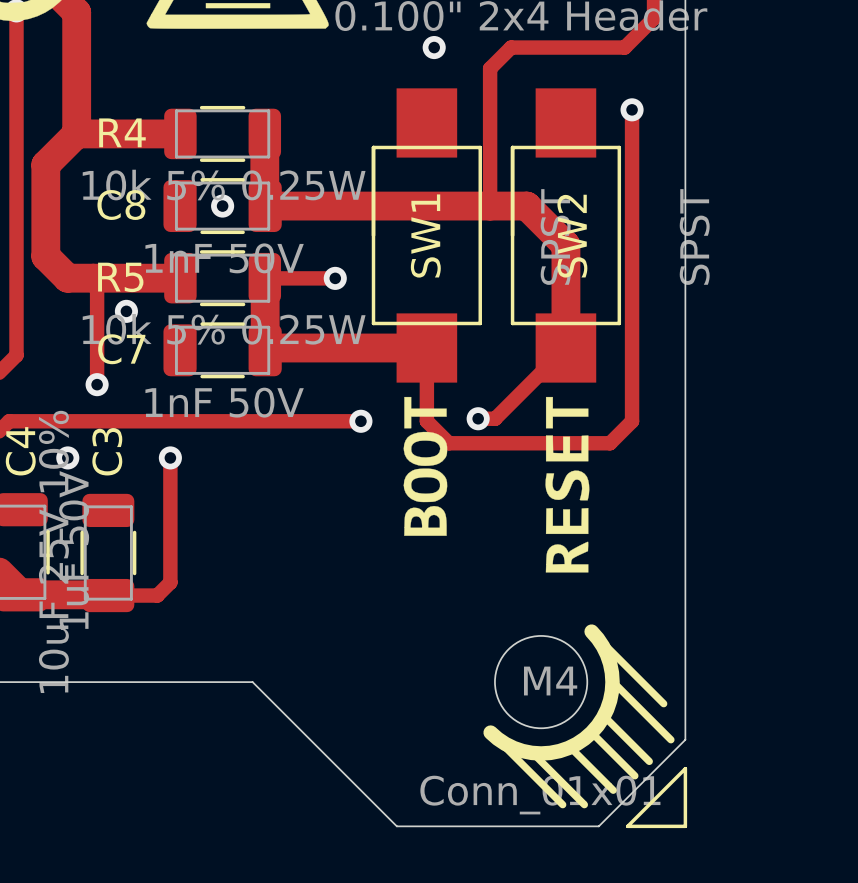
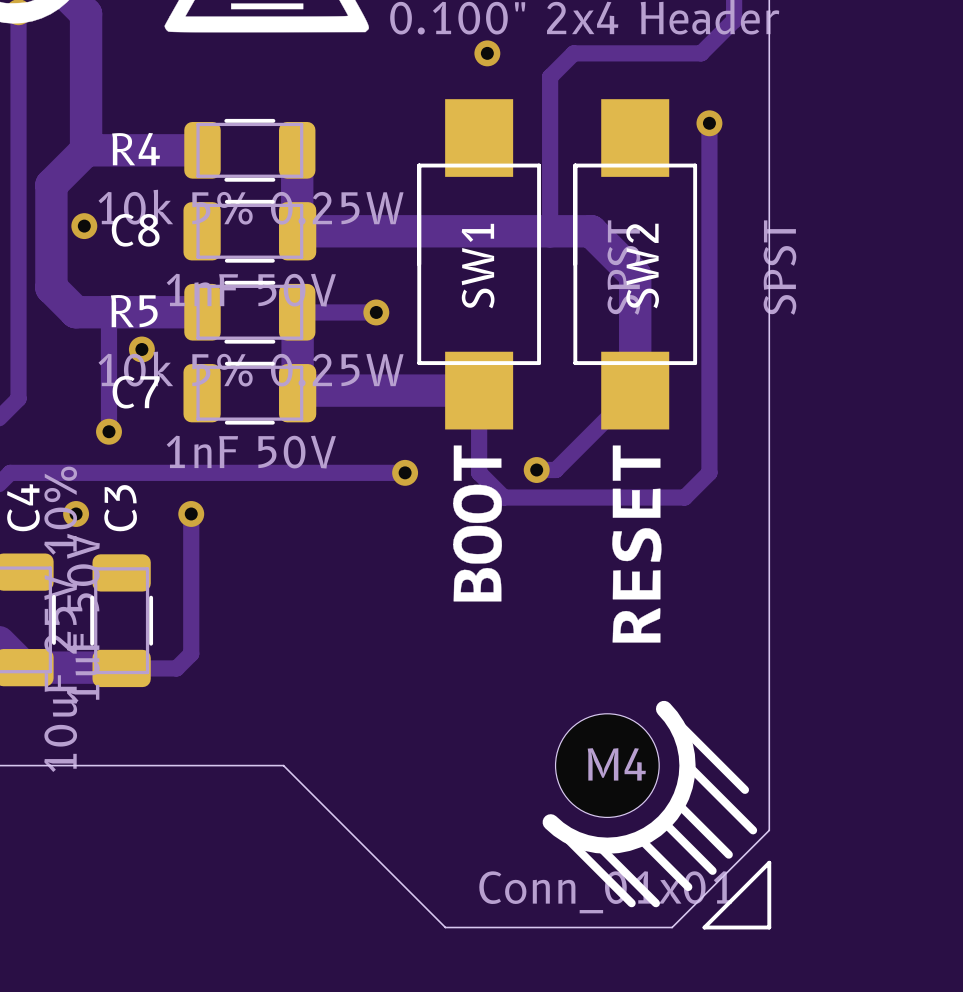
via position: (222, 206) -> (84, 226)

